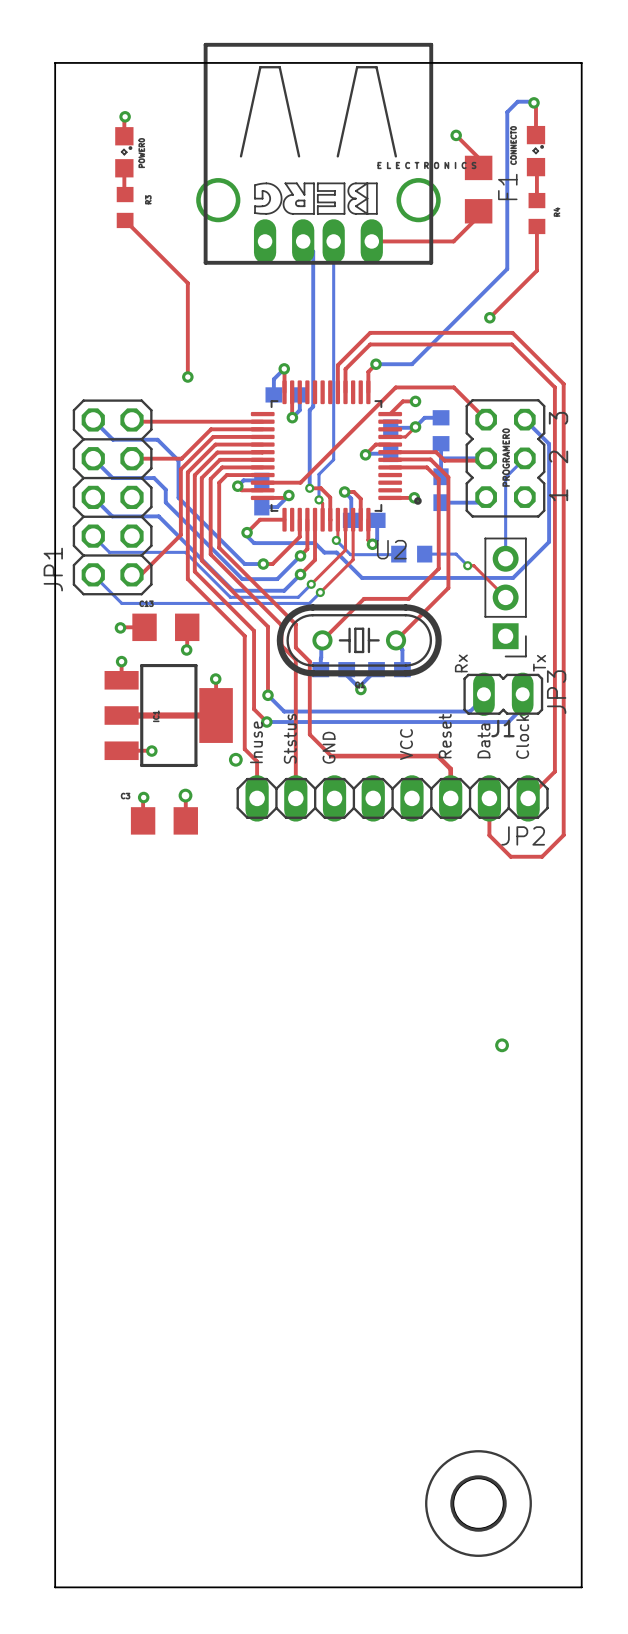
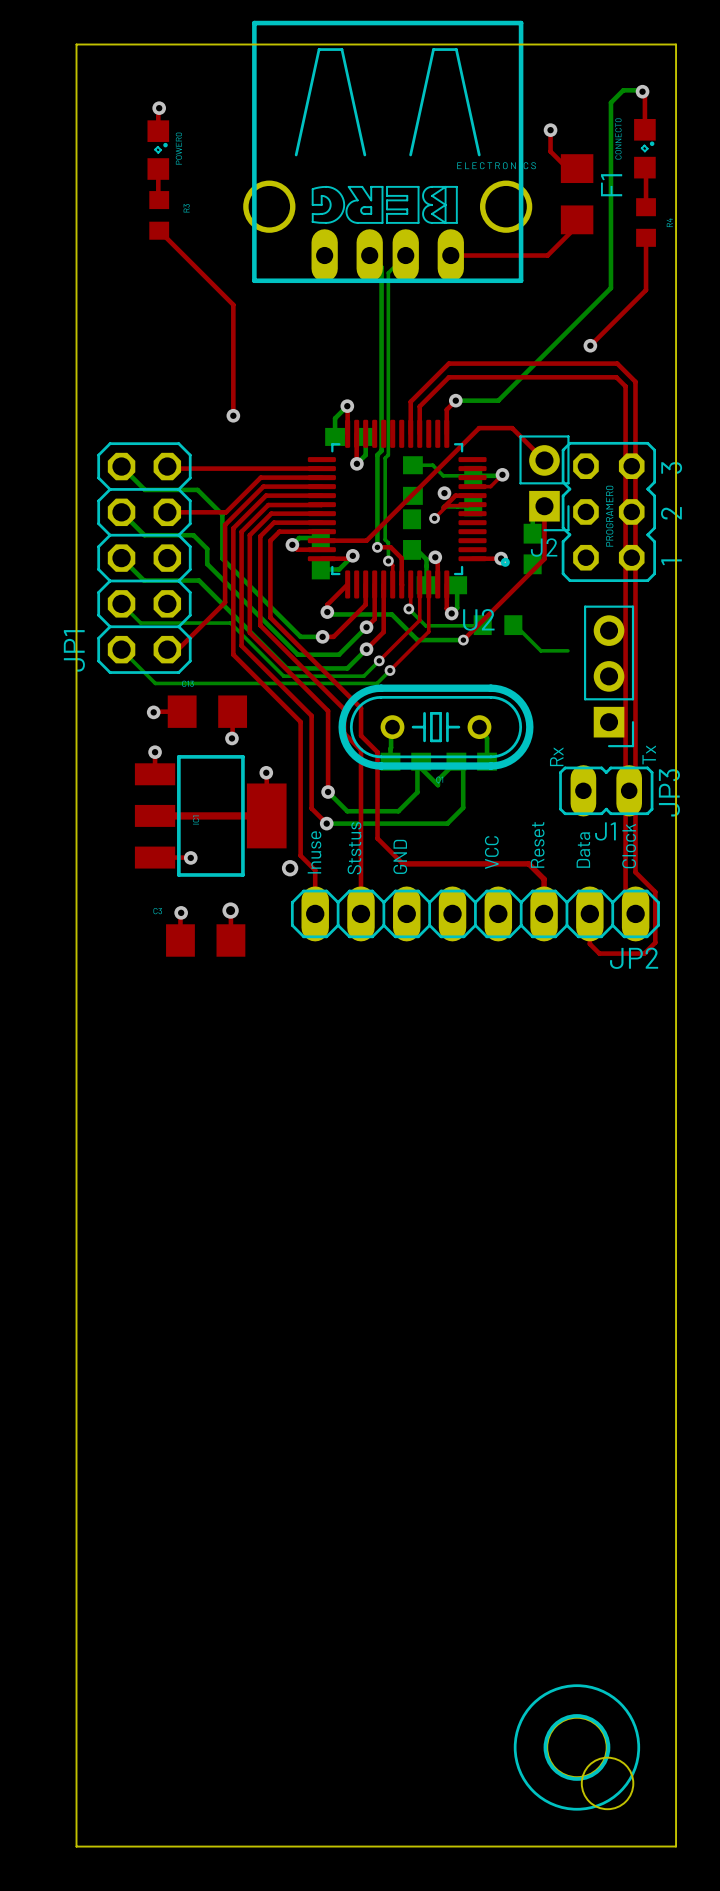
board edge: (562, 62) (581, 62) (581, 1587) (55, 1587) -> (676, 44) (676, 1846) (76, 1846)
top track: (456, 135) (478, 157) (478, 167) -> (550, 130) (550, 151) (567, 168) (577, 168)
bottom track: (333, 241) (333, 459) (319, 474) (319, 484) -> (405, 255) (388, 272) (388, 455) (385, 458) (385, 539) (388, 542)
top track: (528, 348) (563, 383) (563, 835) (542, 856) (510, 856) (489, 835) (489, 823) -> (635, 381) (635, 872) (655, 892) (655, 942) (644, 953) (599, 953) (589, 943)
top track: (519, 352) (554, 387) (554, 771) (528, 798) -> (625, 386) (625, 903) (635, 913)
top track: (423, 387) (453, 387) (486, 419) -> (512, 428) (544, 460)
top track: (415, 401) (402, 401) (390, 414) -> none
via: (415, 401) -> none
bottom track: (441, 417) (424, 417) (415, 426) -> none
bottom track: none -> (412, 465) (432, 465) (443, 475) (473, 475)
bottom track: (524, 419) (549, 443) (549, 541) (513, 577) (362, 577) (336, 552) (324, 552) (314, 543) (254, 543) (247, 536) (247, 532) -> none
part position: (441, 430) -> (412, 480)
J2: none -> (544, 483)
top track: (390, 452) (436, 452) (444, 460) (483, 460) (486, 458) -> (472, 504) (447, 505) (434, 518)
top track: none -> (544, 506) (544, 558) (463, 640)
via position: (365, 454) -> (444, 493)
bottom track: (441, 458) (486, 458) -> none
bottom track: (524, 458) (505, 477) (505, 558) -> none
top track: (390, 459) (430, 459) (448, 477) (448, 588) (396, 640) -> none
via: none -> (434, 518)
top track: (390, 467) (426, 467) (438, 479) (438, 568) (408, 598) (363, 598) (322, 640) -> none
part: none -> (412, 534)
top track: (344, 492) (353, 492) (358, 496) -> none
via position: (344, 492) -> (435, 557)
bottom track: (486, 497) (480, 502) (441, 502) -> none
top track: (284, 519) (260, 519) (247, 532) -> (347, 584) (327, 604) (327, 612)
via position: (247, 532) -> (327, 612)
bottom track: none -> (327, 612) (329, 614) (391, 614) (417, 640) (463, 640)
bottom track: (424, 554) (456, 554) (467, 565) -> none
bottom track: none -> (519, 629) (540, 650) (567, 650)
top track: (467, 565) (473, 565) (505, 597) -> none
via: (467, 565) -> none
via: none -> (463, 640)
bottom track: (484, 679) (484, 697) (470, 711) (327, 711) -> (417, 760) (417, 792) (398, 811)
bottom track: (523, 679) (523, 707) (508, 722) (368, 722) -> (463, 760) (463, 807) (447, 823)
via: (360, 689) -> none
via: (502, 1045) -> none
round board edge: none -> [581, 1757, 634, 1810]

